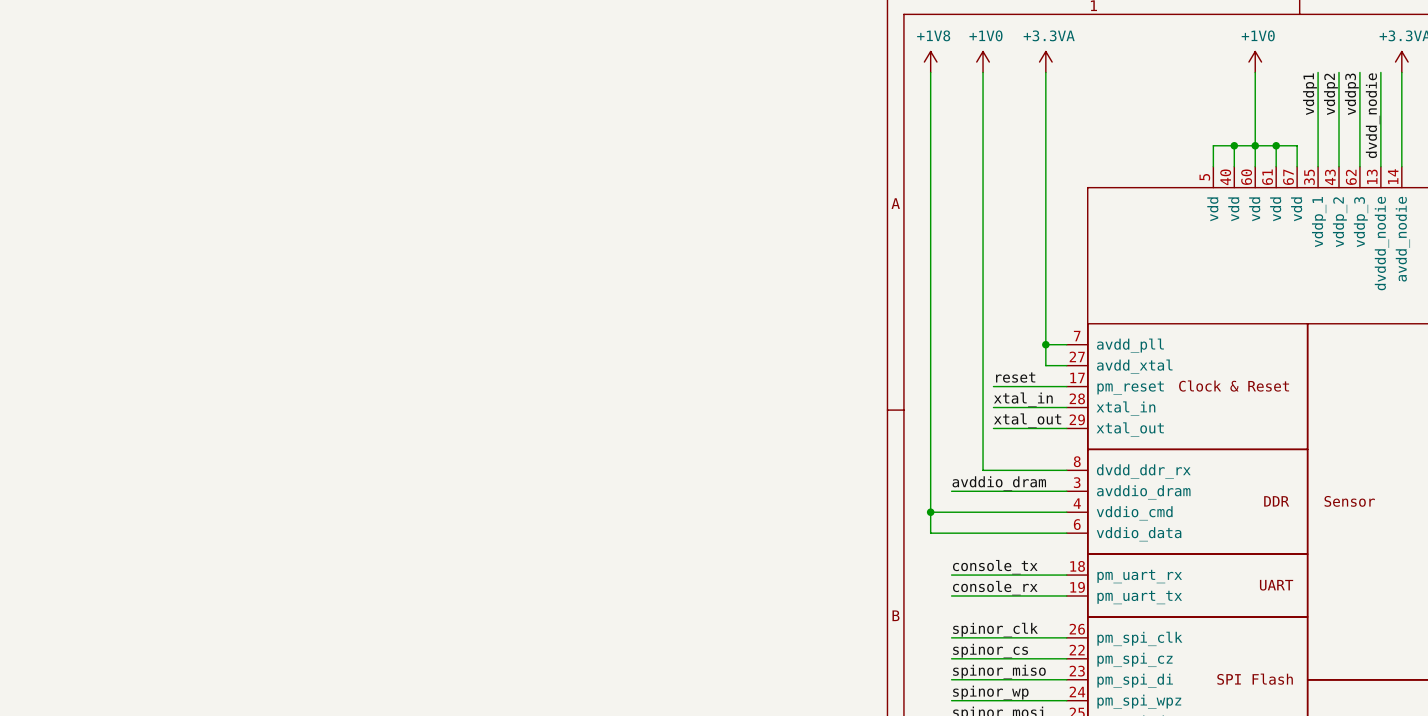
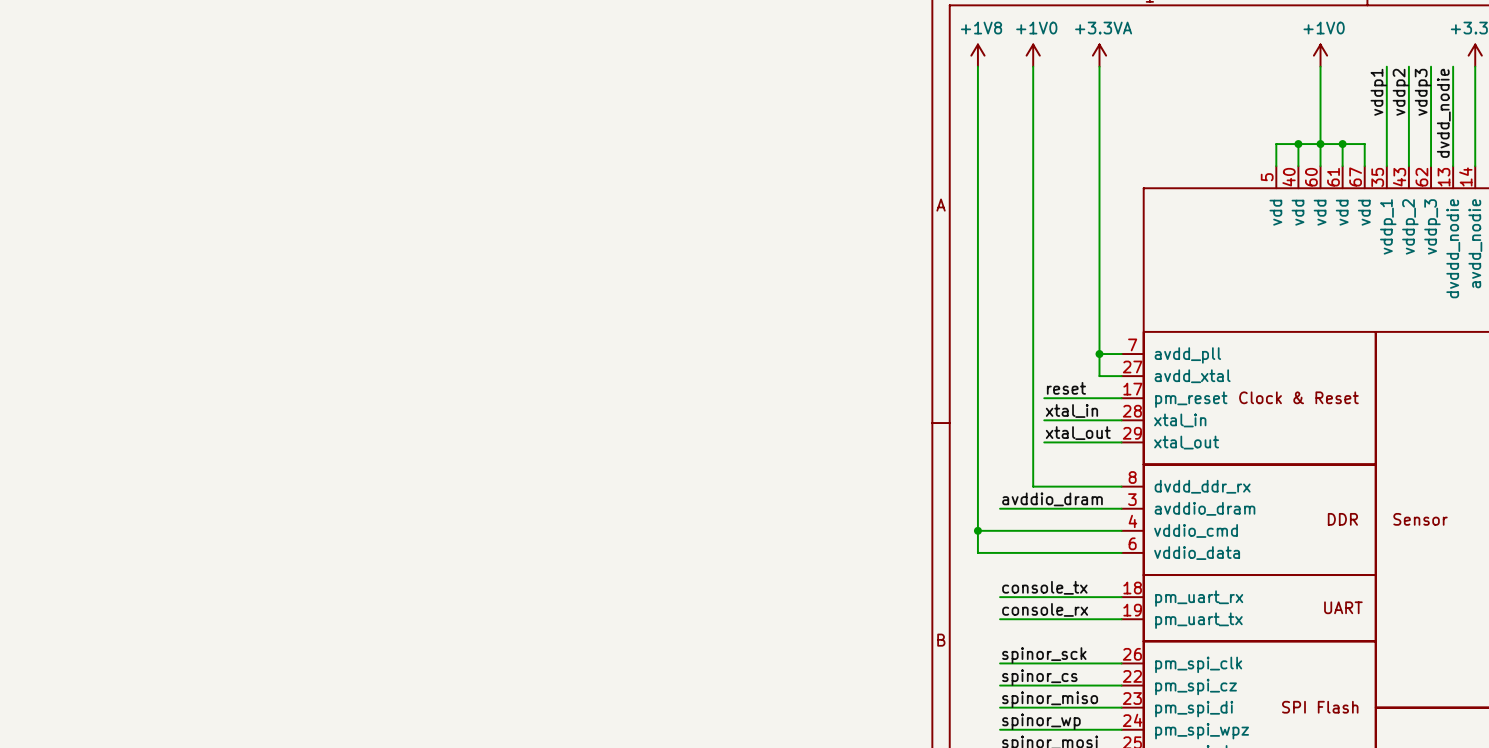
label: spinor_clk (995, 629) -> spinor_sck (1044, 655)

